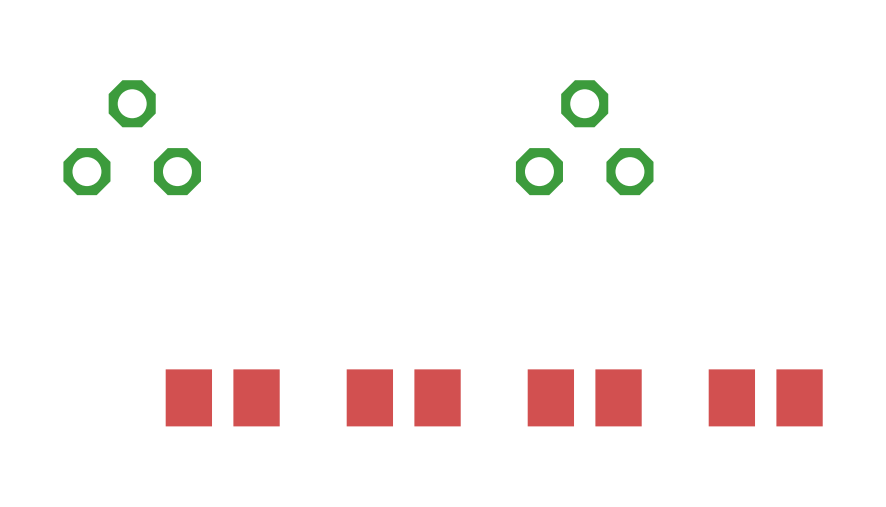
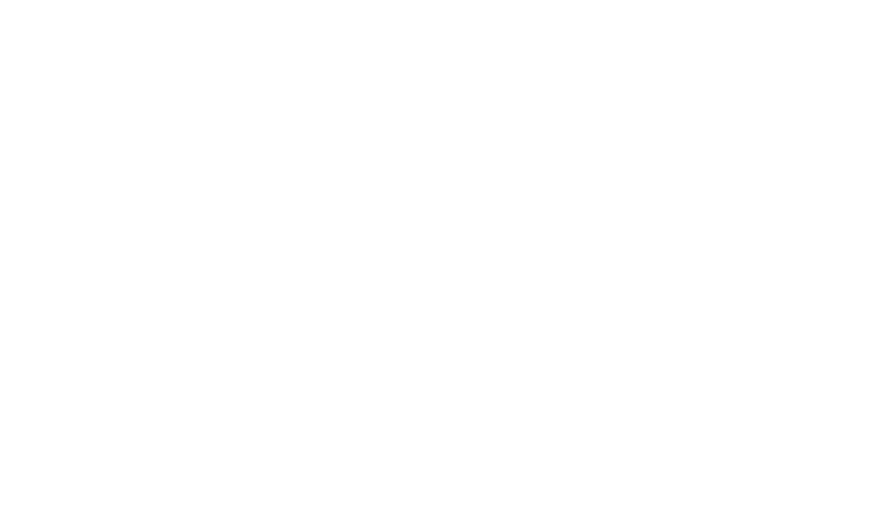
part: (132, 137) -> none
part: (584, 137) -> none
part: (222, 397) -> none
part: (403, 397) -> none
part: (584, 397) -> none
part: (765, 397) -> none

